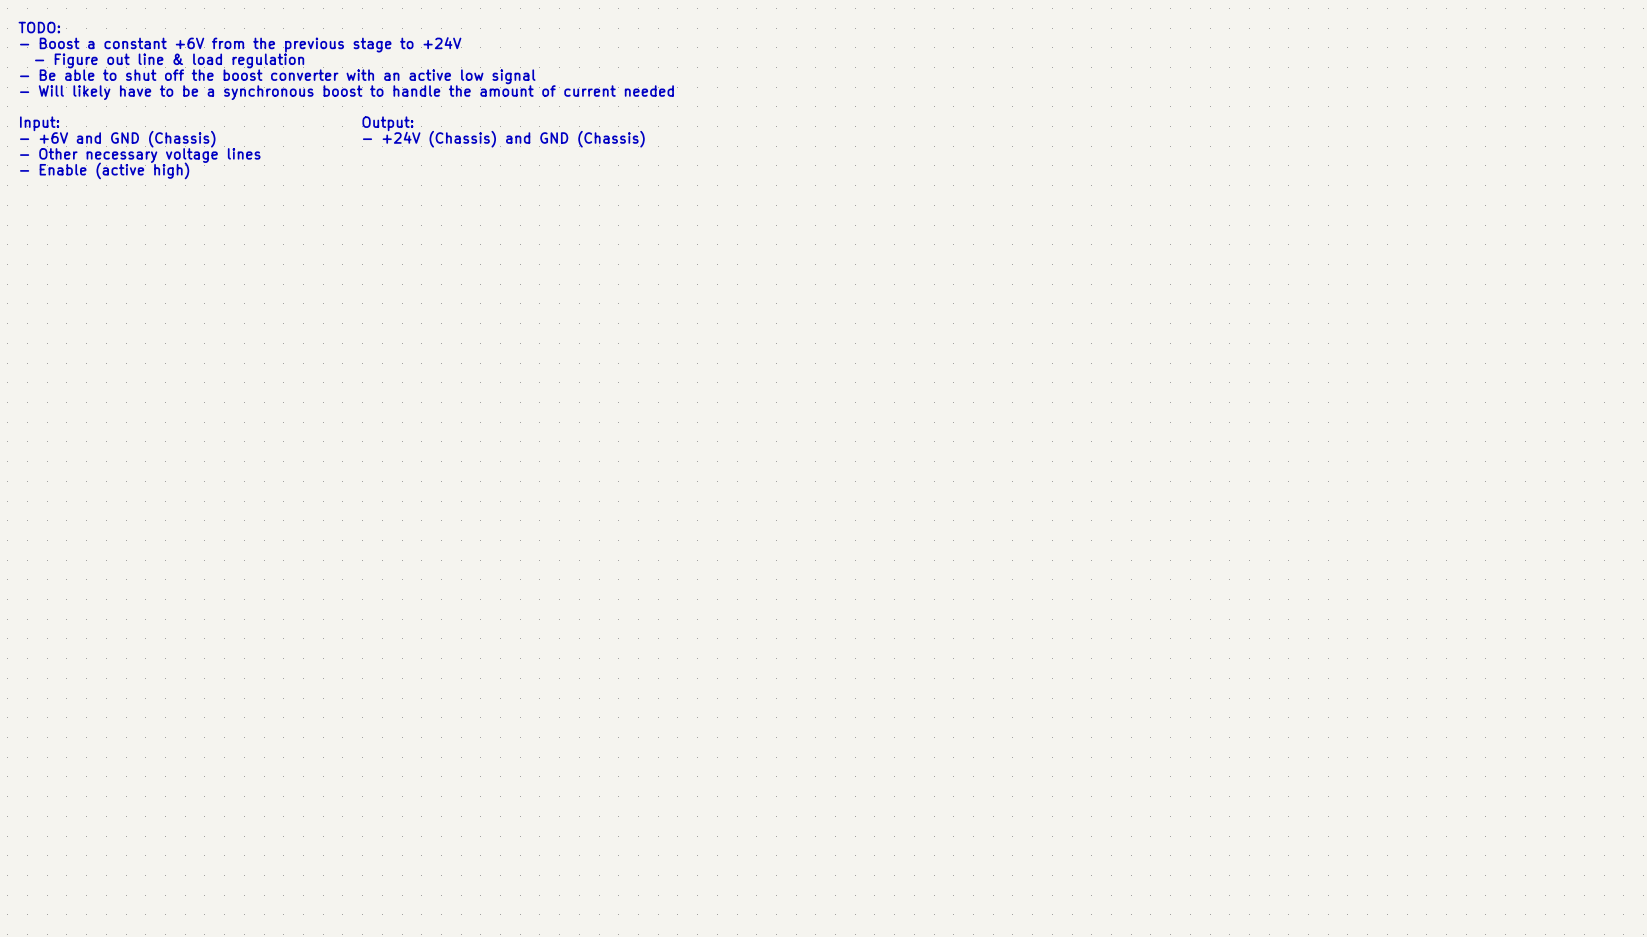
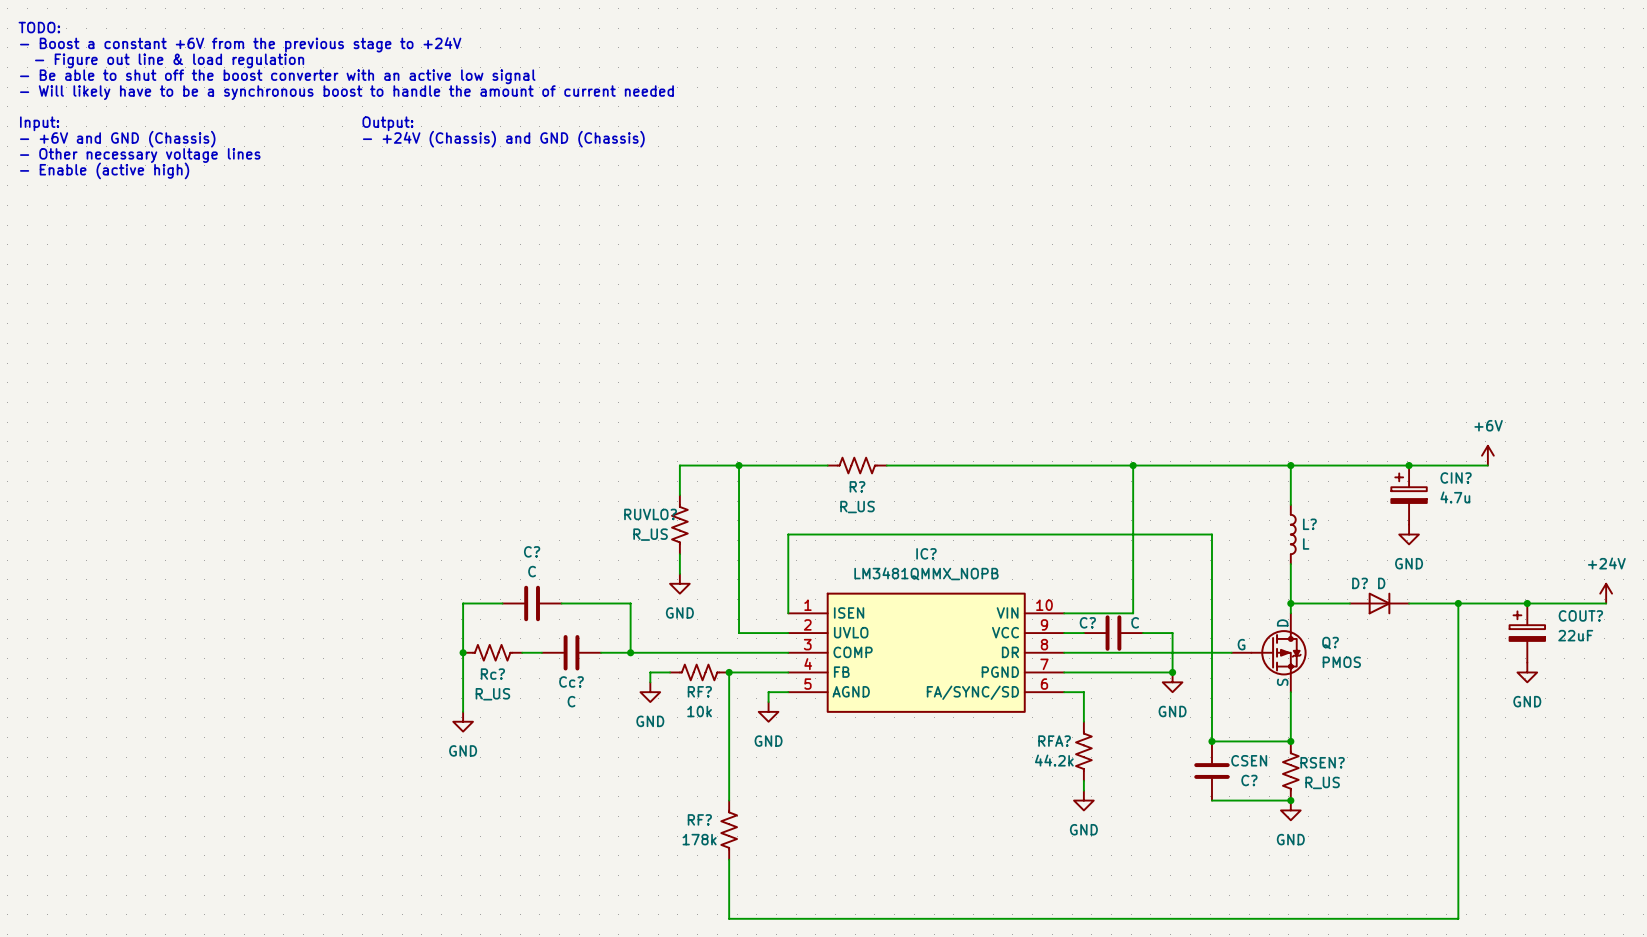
power symbol: none -> +6V (1487, 455)
wire: none -> (739, 465) (739, 633) (788, 633)
junction: none -> (739, 465)
wire: none -> (827, 465) (679, 465) (679, 495)
R?: none -> R_US (857, 465)
wire: none -> (886, 465) (1487, 465)
wire: none -> (1133, 465) (1133, 613) (1064, 613)
junction: none -> (1133, 465)
wire: none -> (1290, 465) (1290, 504)
junction: none -> (1290, 465)
junction: none -> (1409, 465)
CIN?: none -> 4.7u (1409, 495)
RUVLO?: none -> R_US (679, 524)
L?: none -> L (1293, 534)
power symbol: none -> GND (1409, 534)
wire: none -> (679, 554) (679, 573)
wire: none -> (1290, 564) (1290, 613)
power symbol: none -> GND (679, 583)
power symbol: none -> +24V (1606, 593)
wire: none -> (502, 603) (463, 603) (463, 711)
C?: none -> C (532, 603)
wire: none -> (561, 603) (630, 603) (630, 652)
wire: none -> (1290, 603) (1349, 603)
junction: none -> (1290, 603)
D?: none -> D (1379, 603)
wire: none -> (1409, 603) (1606, 603)
wire: none -> (1458, 603) (1458, 918) (729, 918) (729, 859)
junction: none -> (1458, 603)
junction: none -> (1527, 603)
wire: none -> (788, 613) (788, 534) (1211, 534) (1211, 741) (1290, 741) (1290, 692)
wire: none -> (1064, 633) (1083, 633)
C?: none -> C (1113, 633)
wire: none -> (1143, 633) (1172, 633) (1172, 672) (1064, 672)
COUT?: none -> 22uF (1527, 633)
junction: none -> (463, 652)
Rc?: none -> R_US (492, 652)
wire: none -> (522, 652) (541, 652)
Cc?: none -> C (571, 652)
wire: none -> (601, 652) (788, 652)
junction: none -> (630, 652)
IC?: none -> LM3481QMMX_NOPB (926, 652)
wire: none -> (1064, 652) (1231, 652)
Q?: none -> PMOS (1269, 652)
wire: none -> (670, 672) (650, 672) (650, 682)
RF?: none -> 10k (699, 672)
junction: none -> (729, 672)
wire: none -> (788, 672) (729, 672) (729, 800)
junction: none -> (1172, 672)
power symbol: none -> GND (1527, 672)
power symbol: none -> GND (1172, 682)
power symbol: none -> GND (650, 692)
wire: none -> (788, 692) (768, 692) (768, 702)
wire: none -> (1064, 692) (1083, 692) (1083, 721)
power symbol: none -> GND (768, 711)
power symbol: none -> GND (463, 721)
junction: none -> (1211, 741)
junction: none -> (1290, 741)
RFA?: none -> 44.2k (1083, 751)
C?: none -> CSEN (1211, 771)
RSEN?: none -> R_US (1290, 771)
wire: none -> (1083, 780) (1083, 790)
power symbol: none -> GND (1083, 800)
wire: none -> (1211, 800) (1290, 800)
junction: none -> (1290, 800)
power symbol: none -> GND (1290, 810)
RF?: none -> 178k (729, 830)

